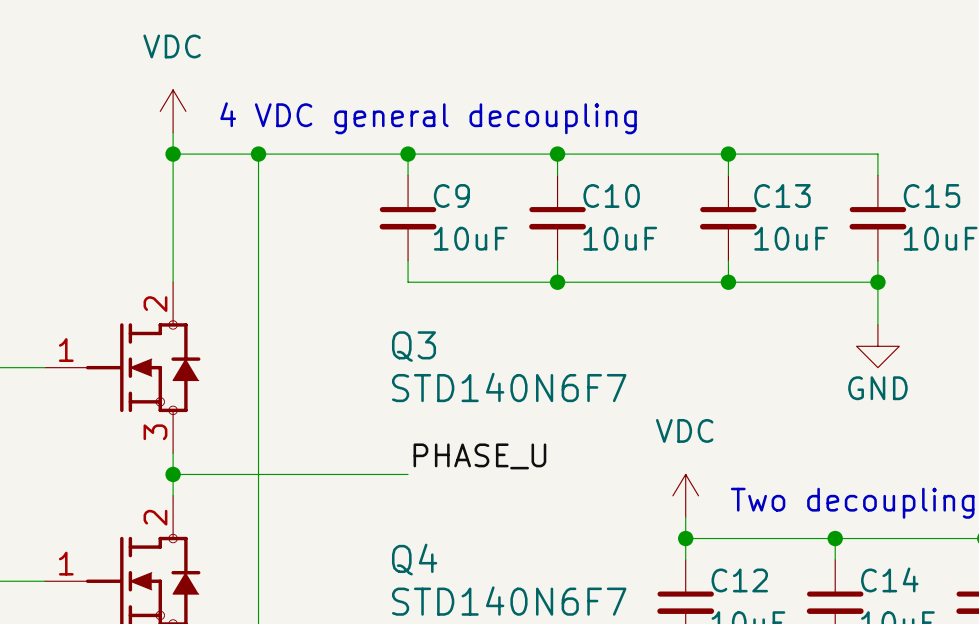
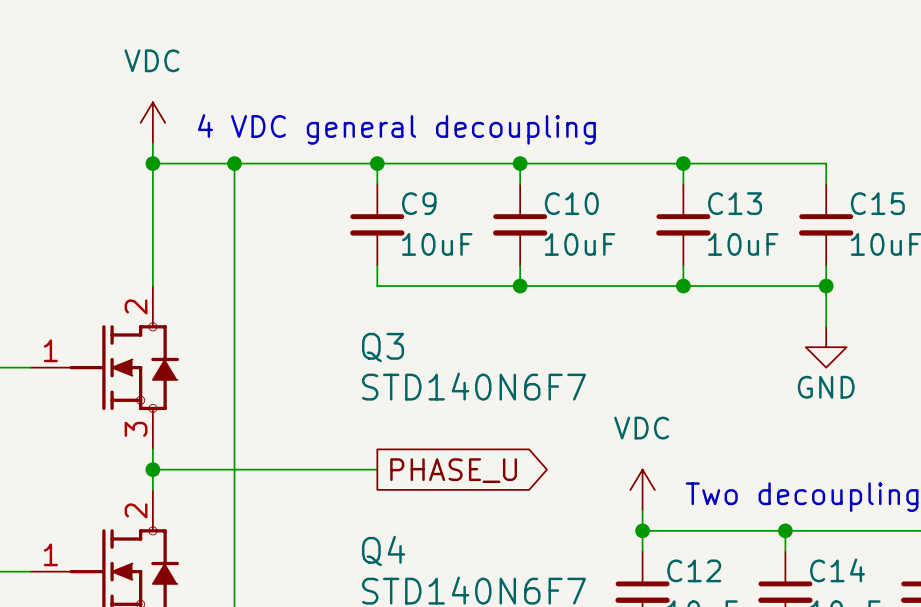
label: PHASE_U (479, 456) -> none
global label: none -> PHASE_U (453, 470)

